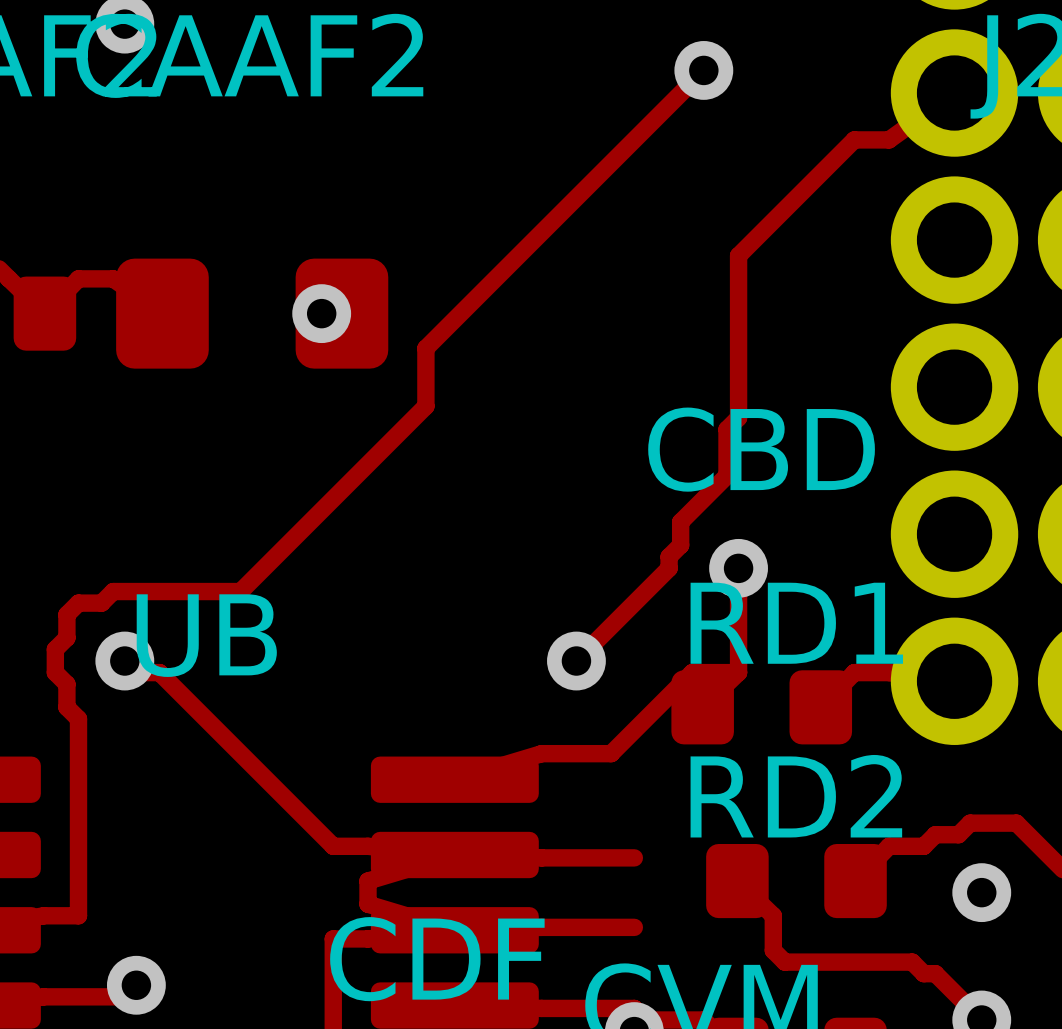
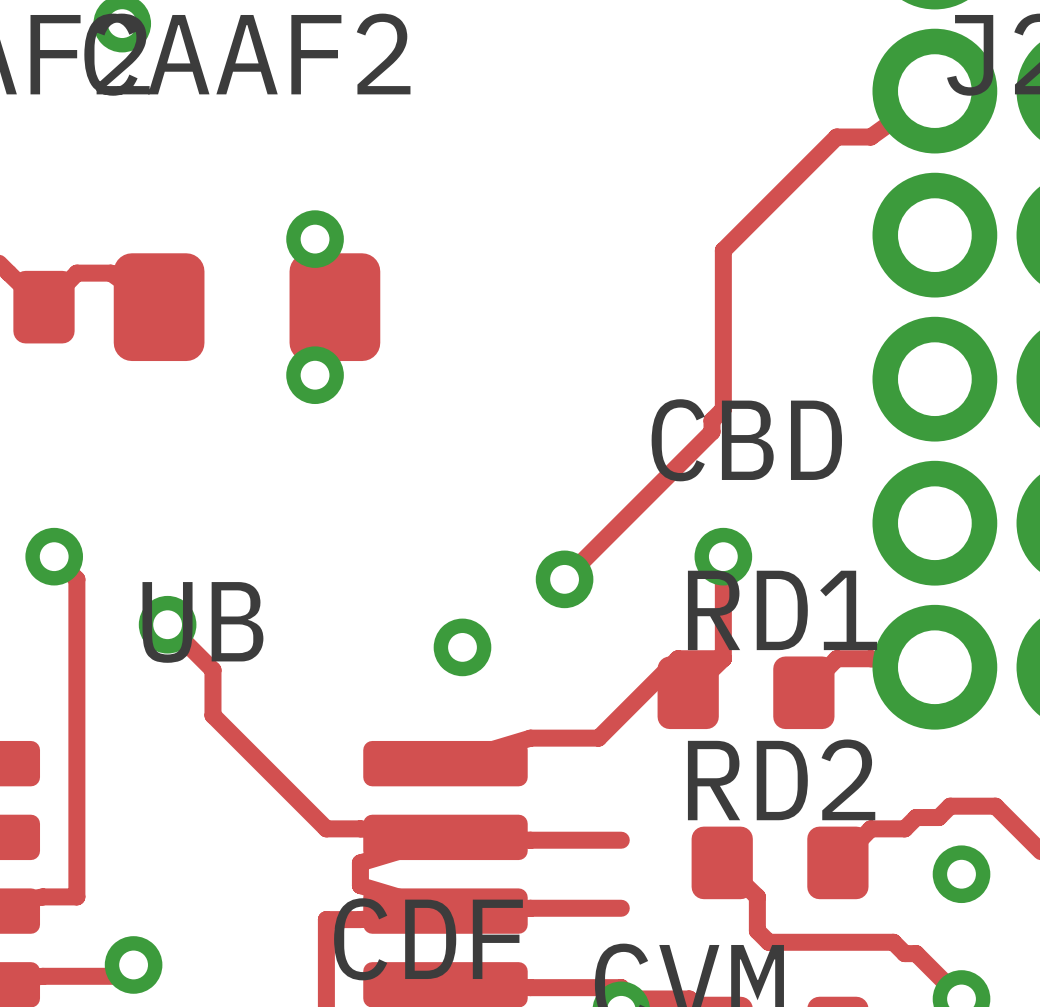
track: (703, 70) (425, 348) (425, 406) (240, 591) (113, 591) (101, 603) (78, 603) (66, 614) (66, 637) (55, 649) (55, 672) (66, 684) (66, 707) (78, 718) -> (54, 556) (76, 579) (76, 704)
via: (703, 70) -> none
via: none -> (315, 239)
via: (321, 313) -> none
via: none -> (315, 375)
track: (726, 441) (726, 475) (680, 522) (680, 545) (669, 556) (669, 568) (576, 661) -> (712, 431) (564, 579)
via: none -> (54, 556)
via: none -> (564, 579)
track: (124, 661) (136, 672) (159, 672) (217, 730) -> (167, 624) (212, 670) (212, 715)
via position: (124, 661) -> (167, 624)
via: none -> (462, 647)
via: (576, 661) -> none

